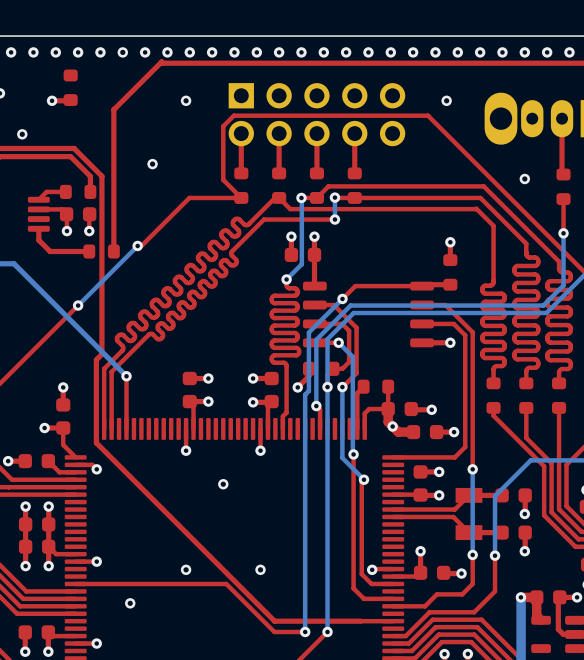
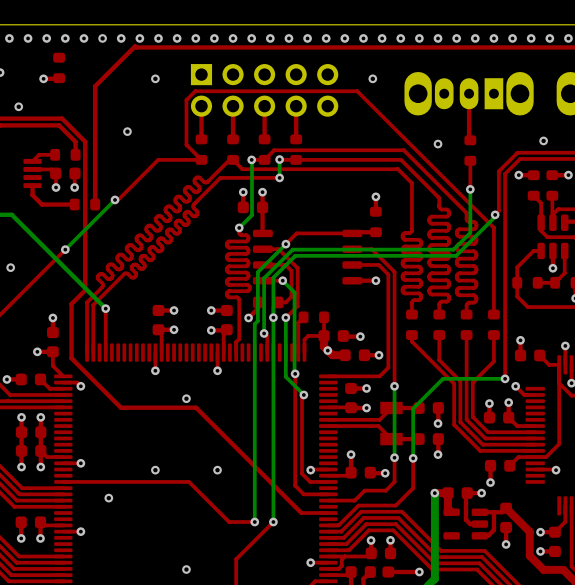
via: none -> (10, 267)
top track: (96, 359) (96, 442) (274, 621) (361, 621) -> (80, 294) (71, 303) (71, 358) (120, 407) (196, 407) (301, 513)

